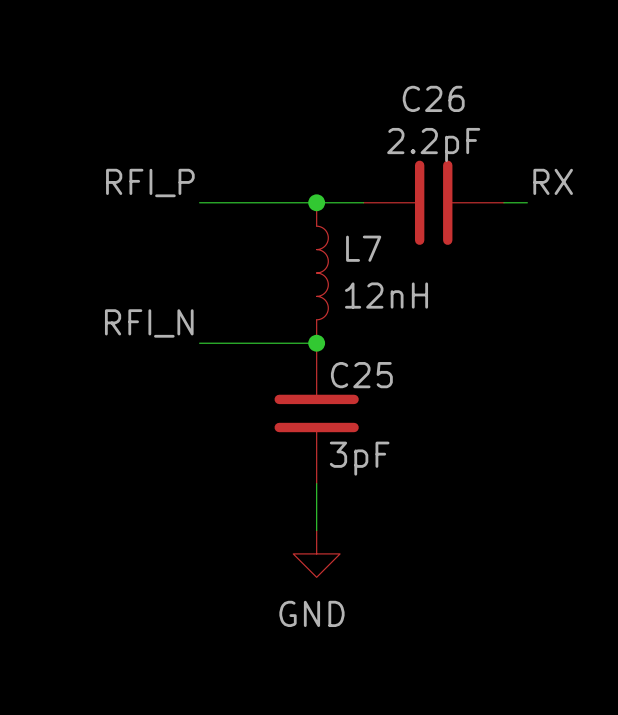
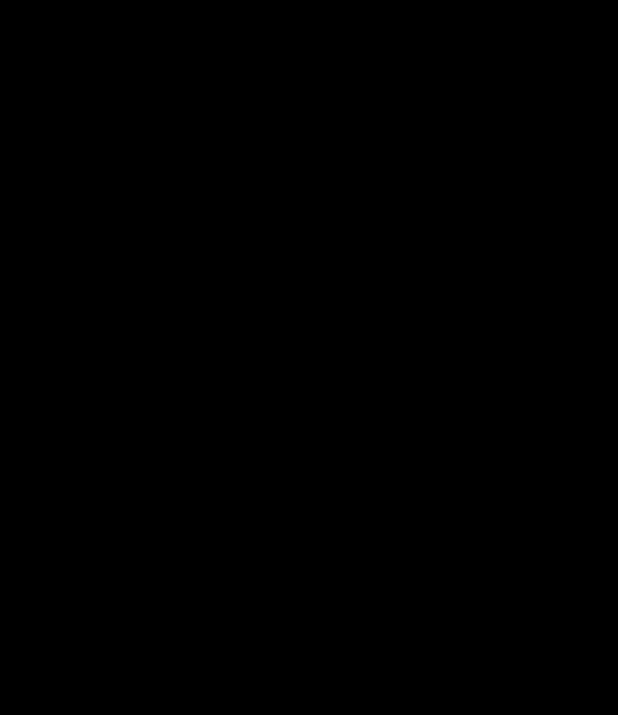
label: RX (553, 181) -> none
label: RFI_P (150, 183) -> none
wire: (199, 202) (363, 202) -> none
junction: (316, 202) -> none
C26: 2.2pF (433, 202) -> none
wire: (503, 202) (527, 202) -> none
L7: 12nH (322, 273) -> none
label: RFI_N (149, 323) -> none
wire: (199, 343) (316, 343) -> none
junction: (316, 343) -> none
C25: 3pF (316, 413) -> none
wire: (316, 483) (316, 530) -> none
power symbol: GND (316, 553) -> none

